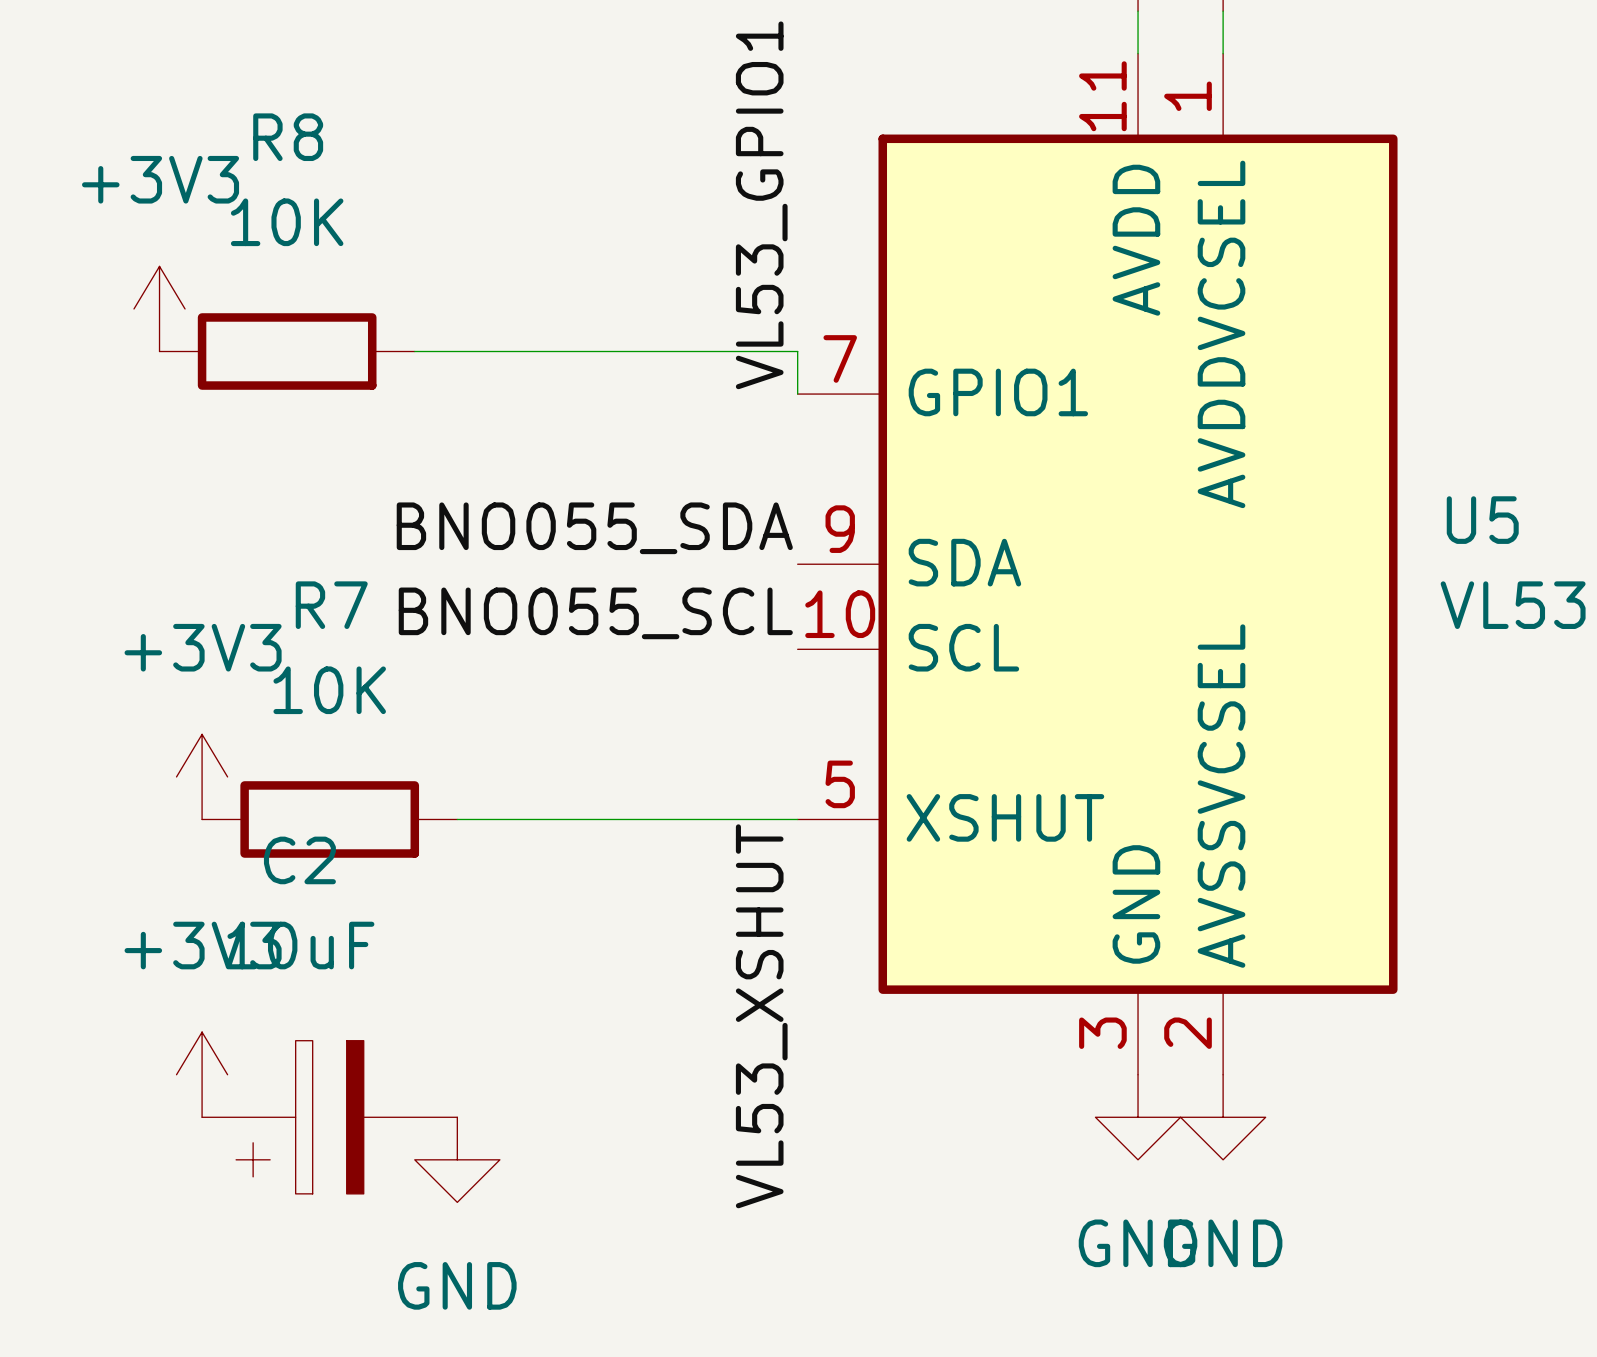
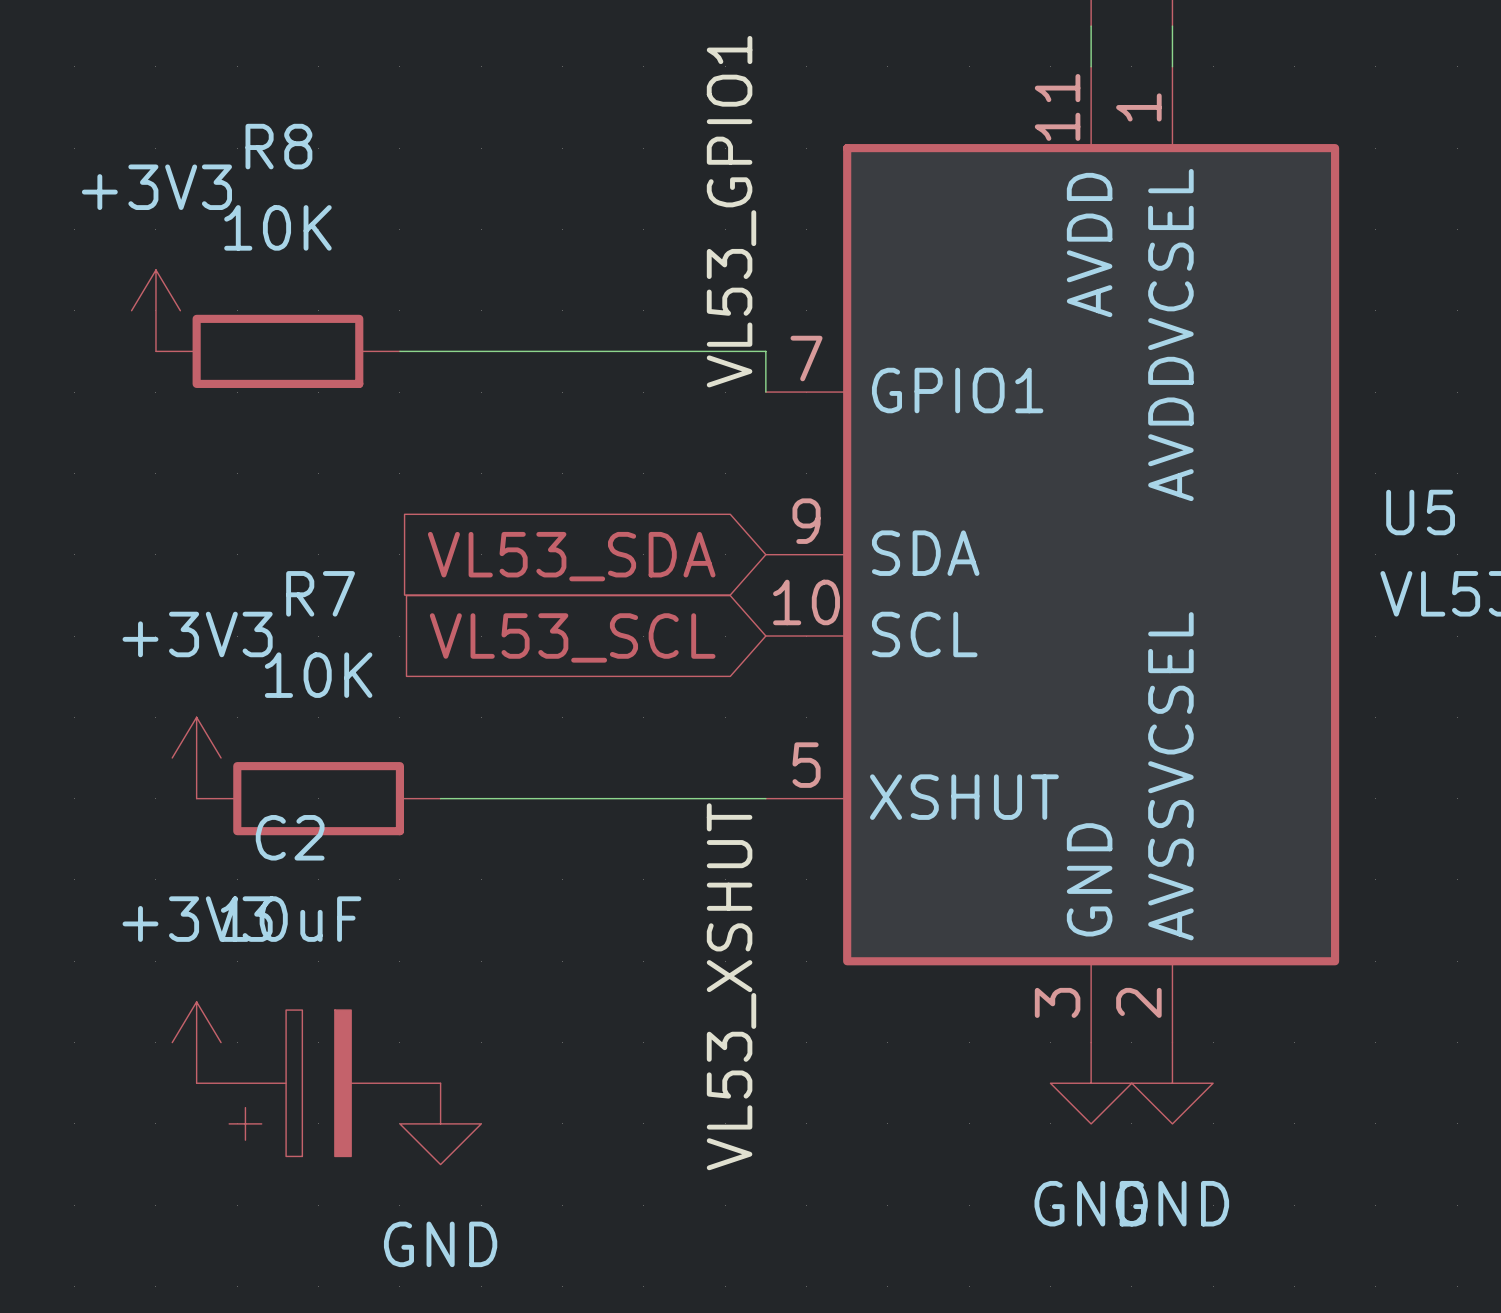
label: BNO055_SDA (594, 528) -> none
global label: none -> VL53_SDA (571, 556)
label: BNO055_SCL (595, 613) -> none
global label: none -> VL53_SCL (572, 637)

